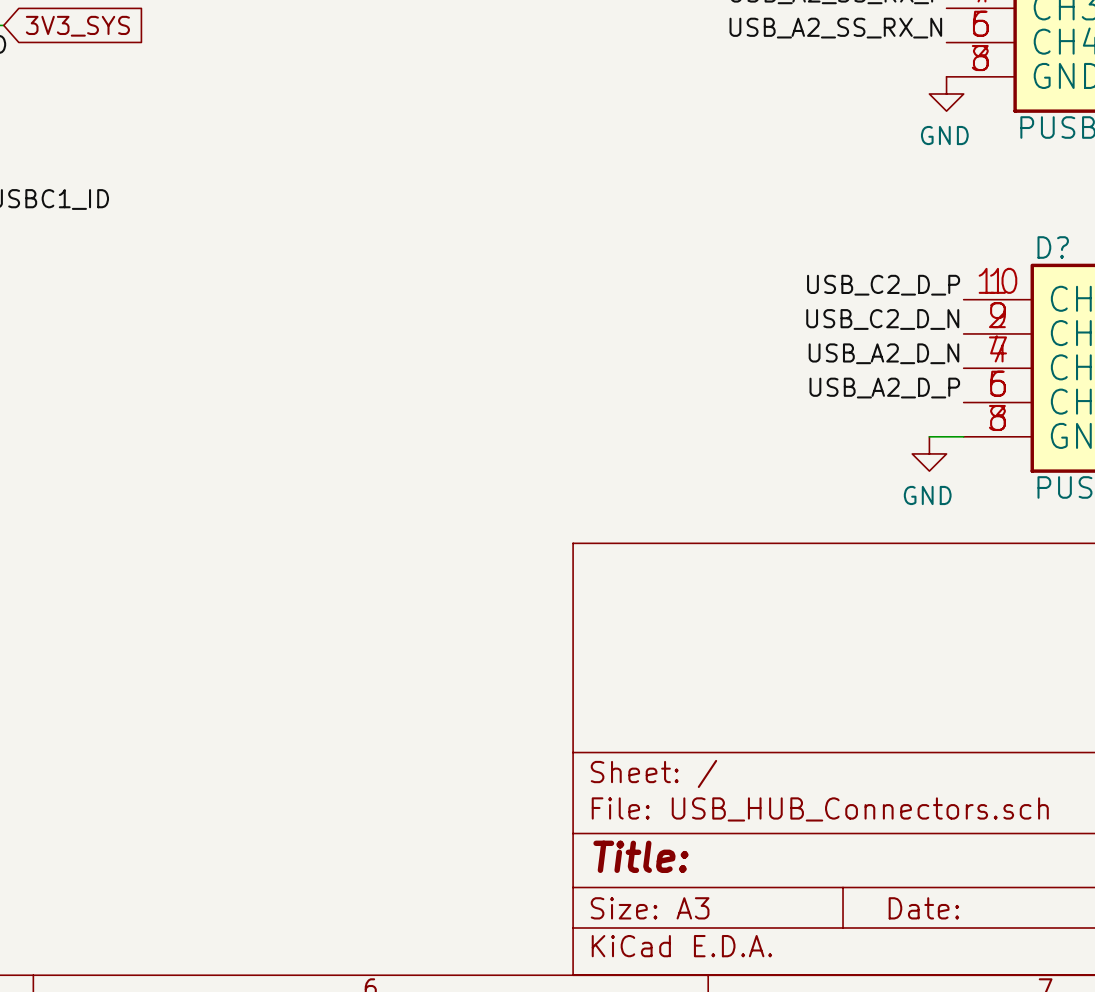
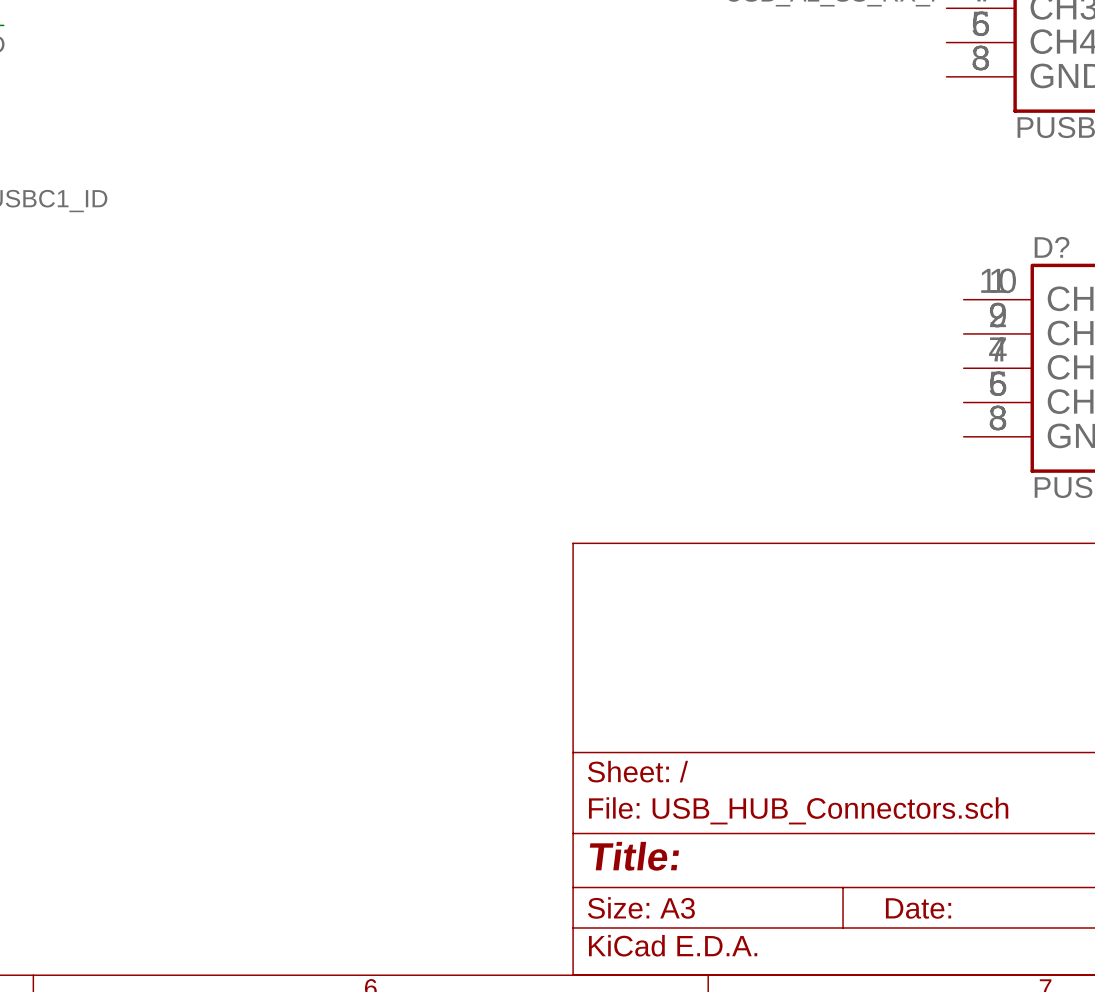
global label: 3V3_SYS (77, 26) -> none
label: USB_A2_SS_RX_N (835, 28) -> none
power symbol: GND (946, 93) -> none
label: USB_C2_D_P (883, 285) -> none
label: USB_C2_D_N (882, 319) -> none
label: USB_A2_D_N (883, 353) -> none
label: USB_A2_D_P (884, 388) -> none
wire: (929, 436) (963, 436) -> none
power symbol: GND (929, 453) -> none

